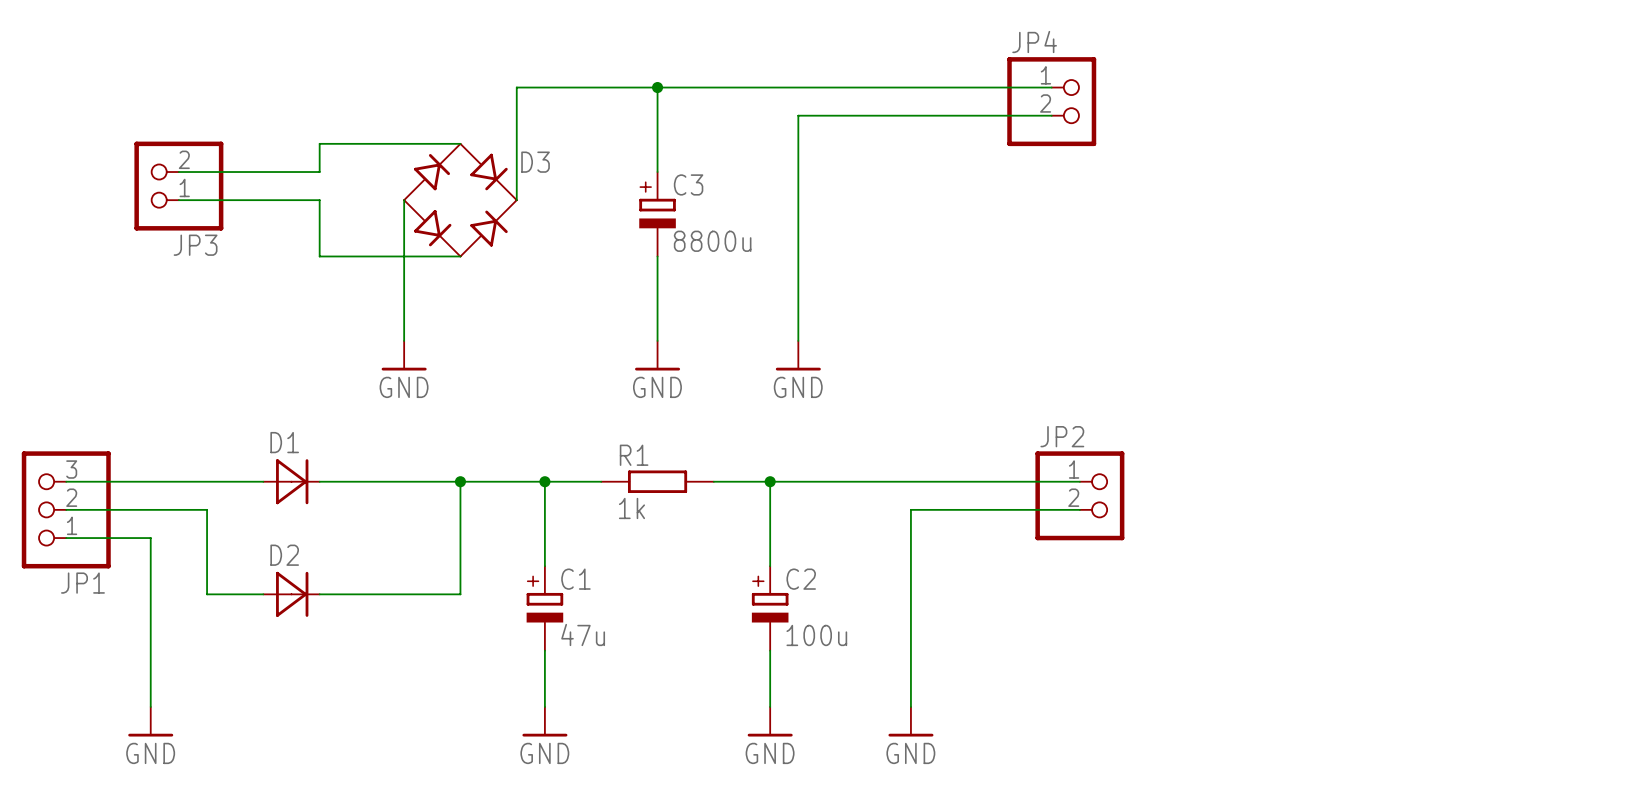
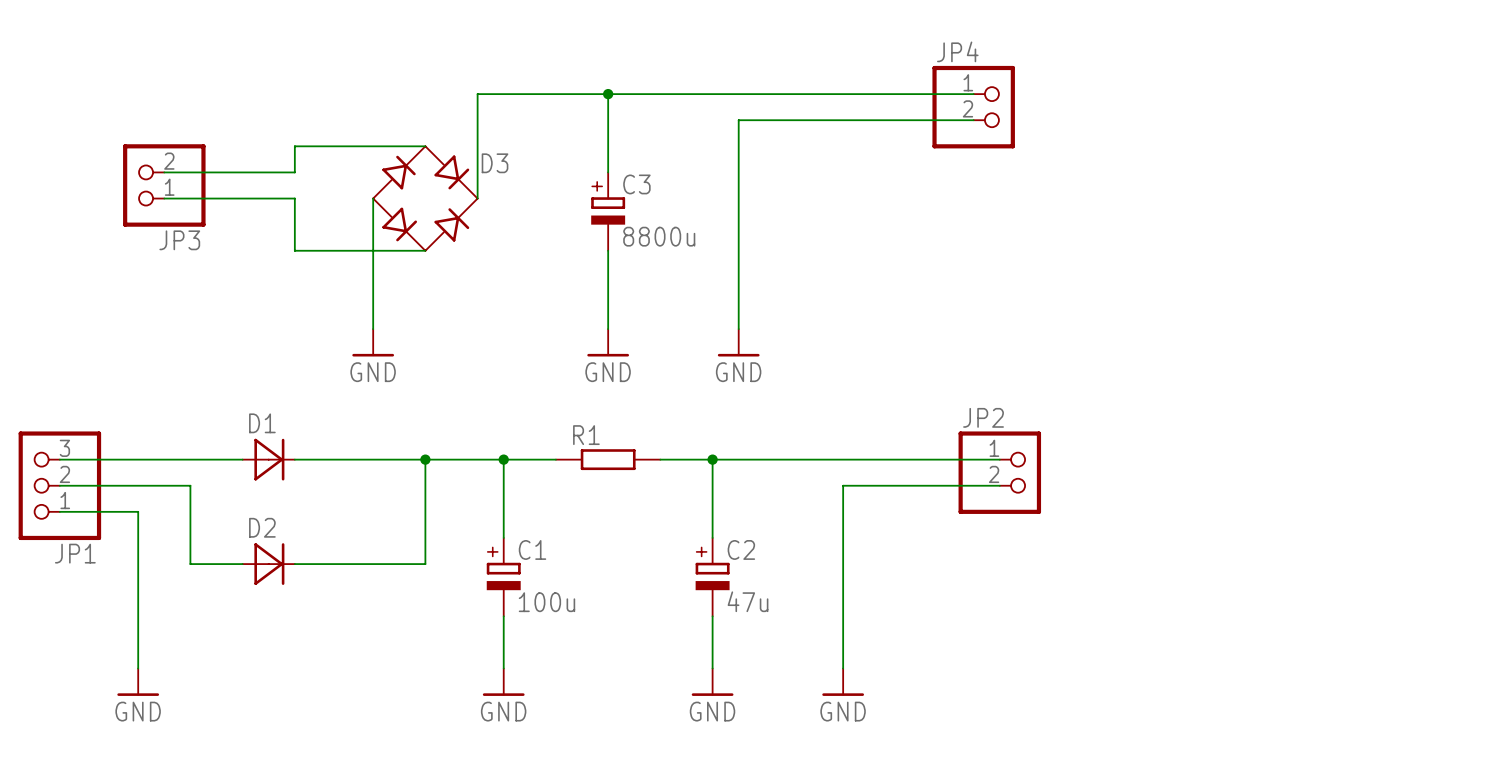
R1 value: 1k (631, 508) -> none
C1 value: 47u (583, 634) -> 100u (546, 602)
C2 value: 100u (816, 635) -> 47u (748, 601)

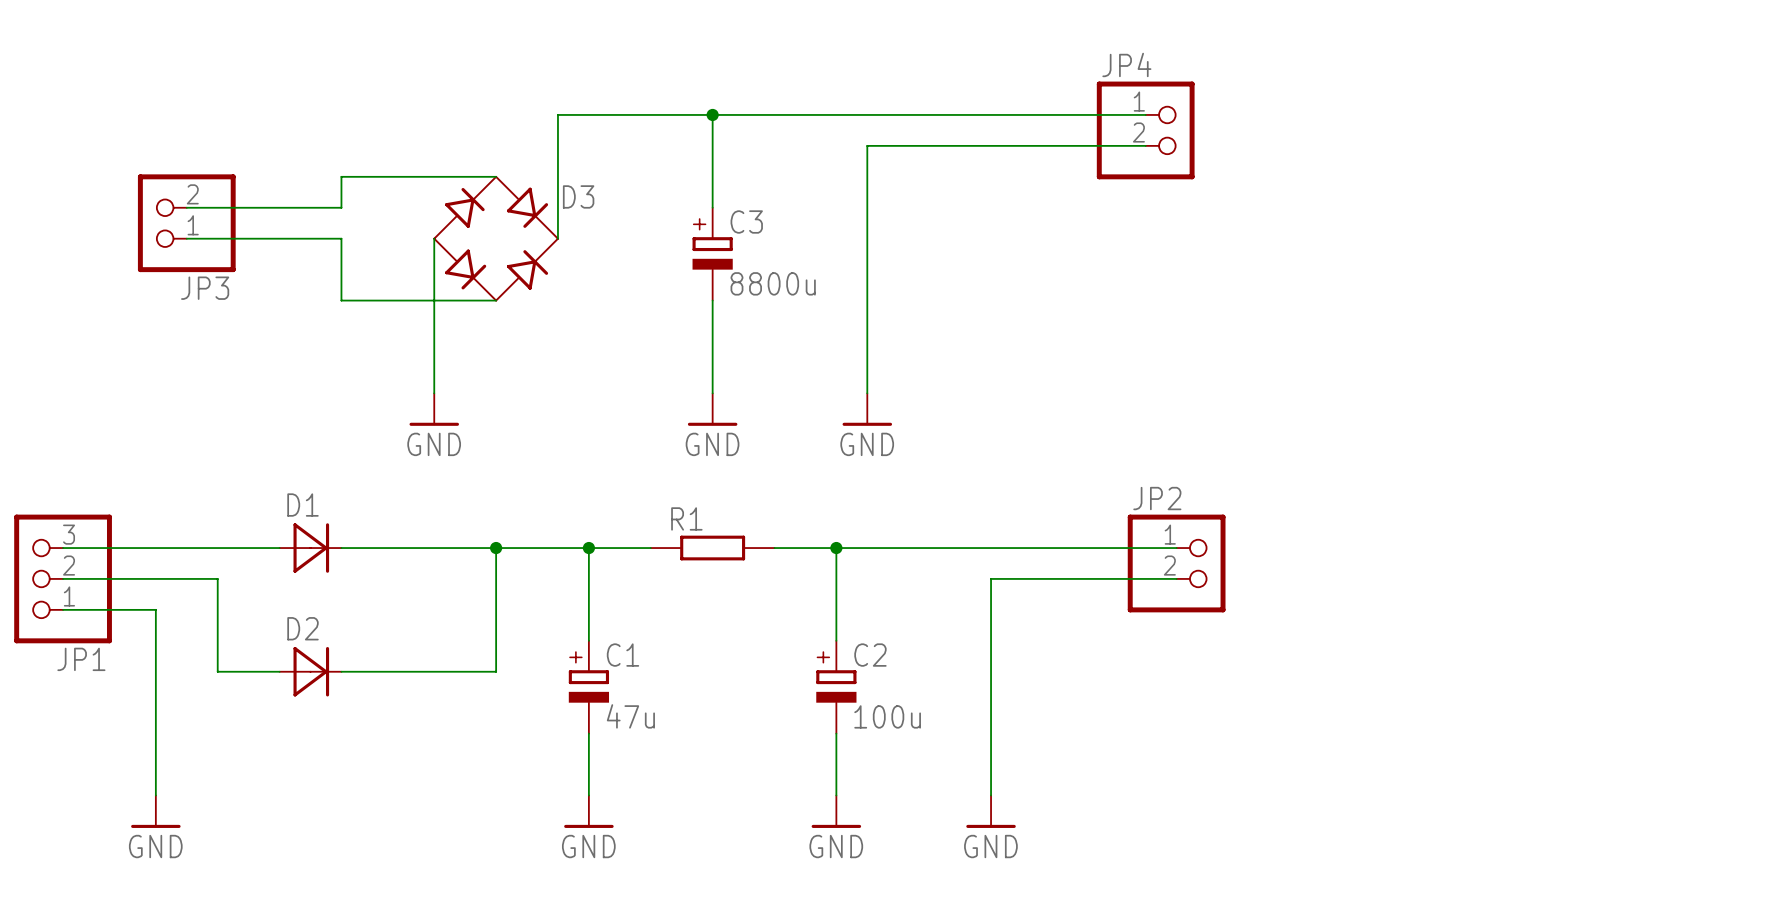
C2 value: 47u (748, 601) -> 100u (887, 716)
C1 value: 100u (546, 602) -> 47u (630, 716)

